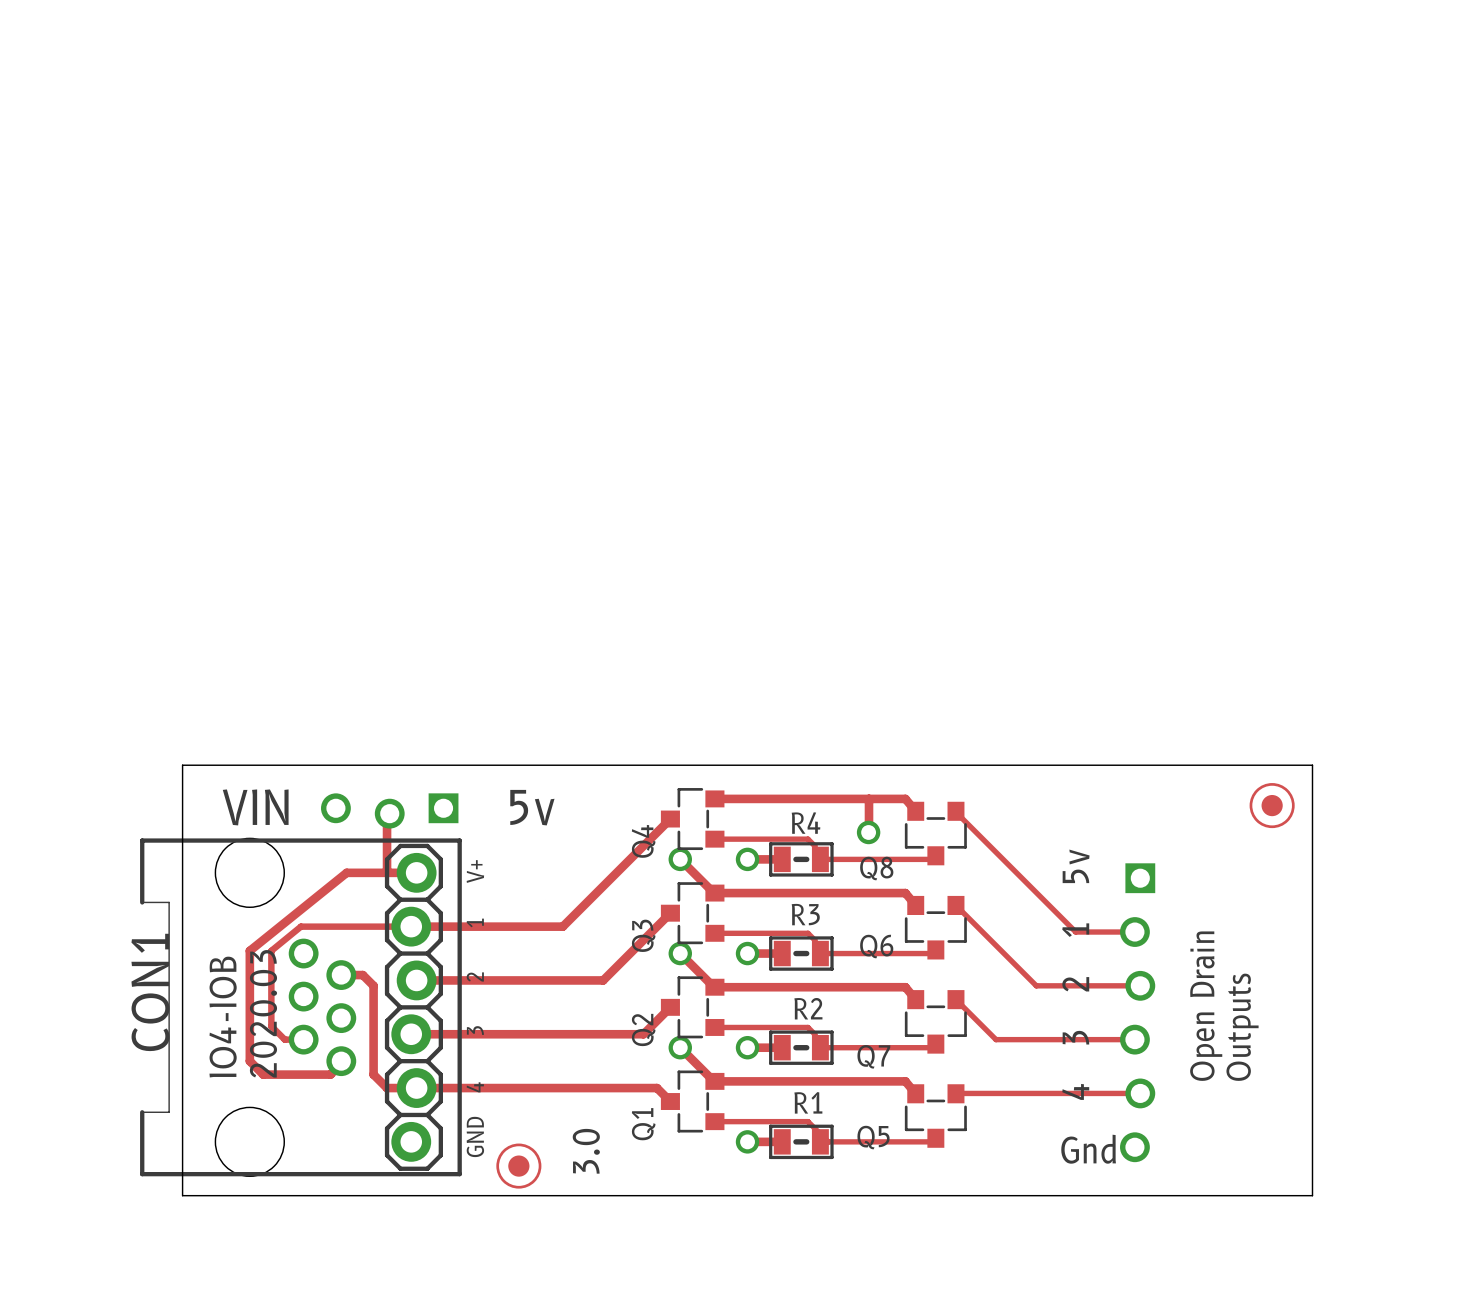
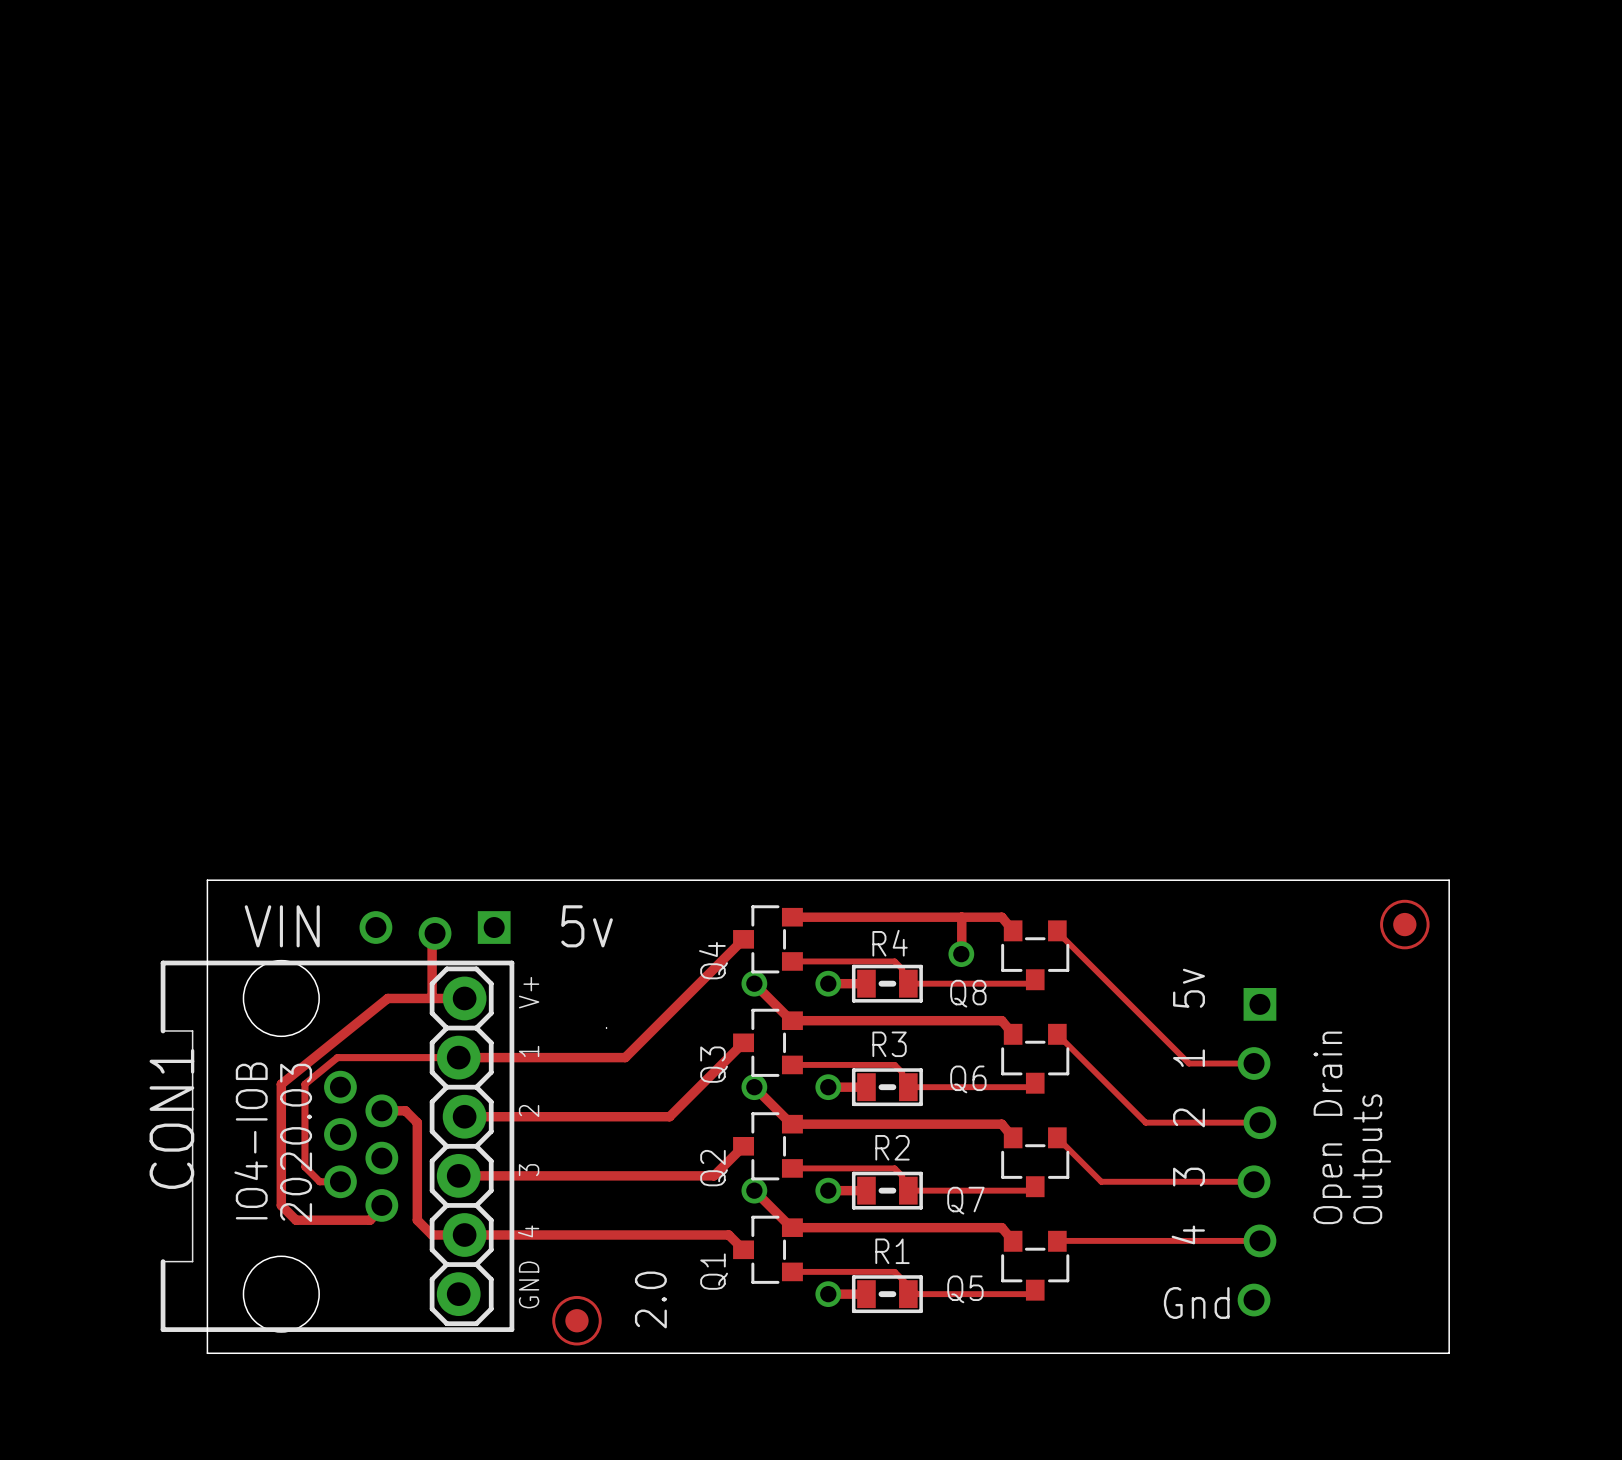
text: 3.0 (586, 1151) -> 2.0 (650, 1299)

